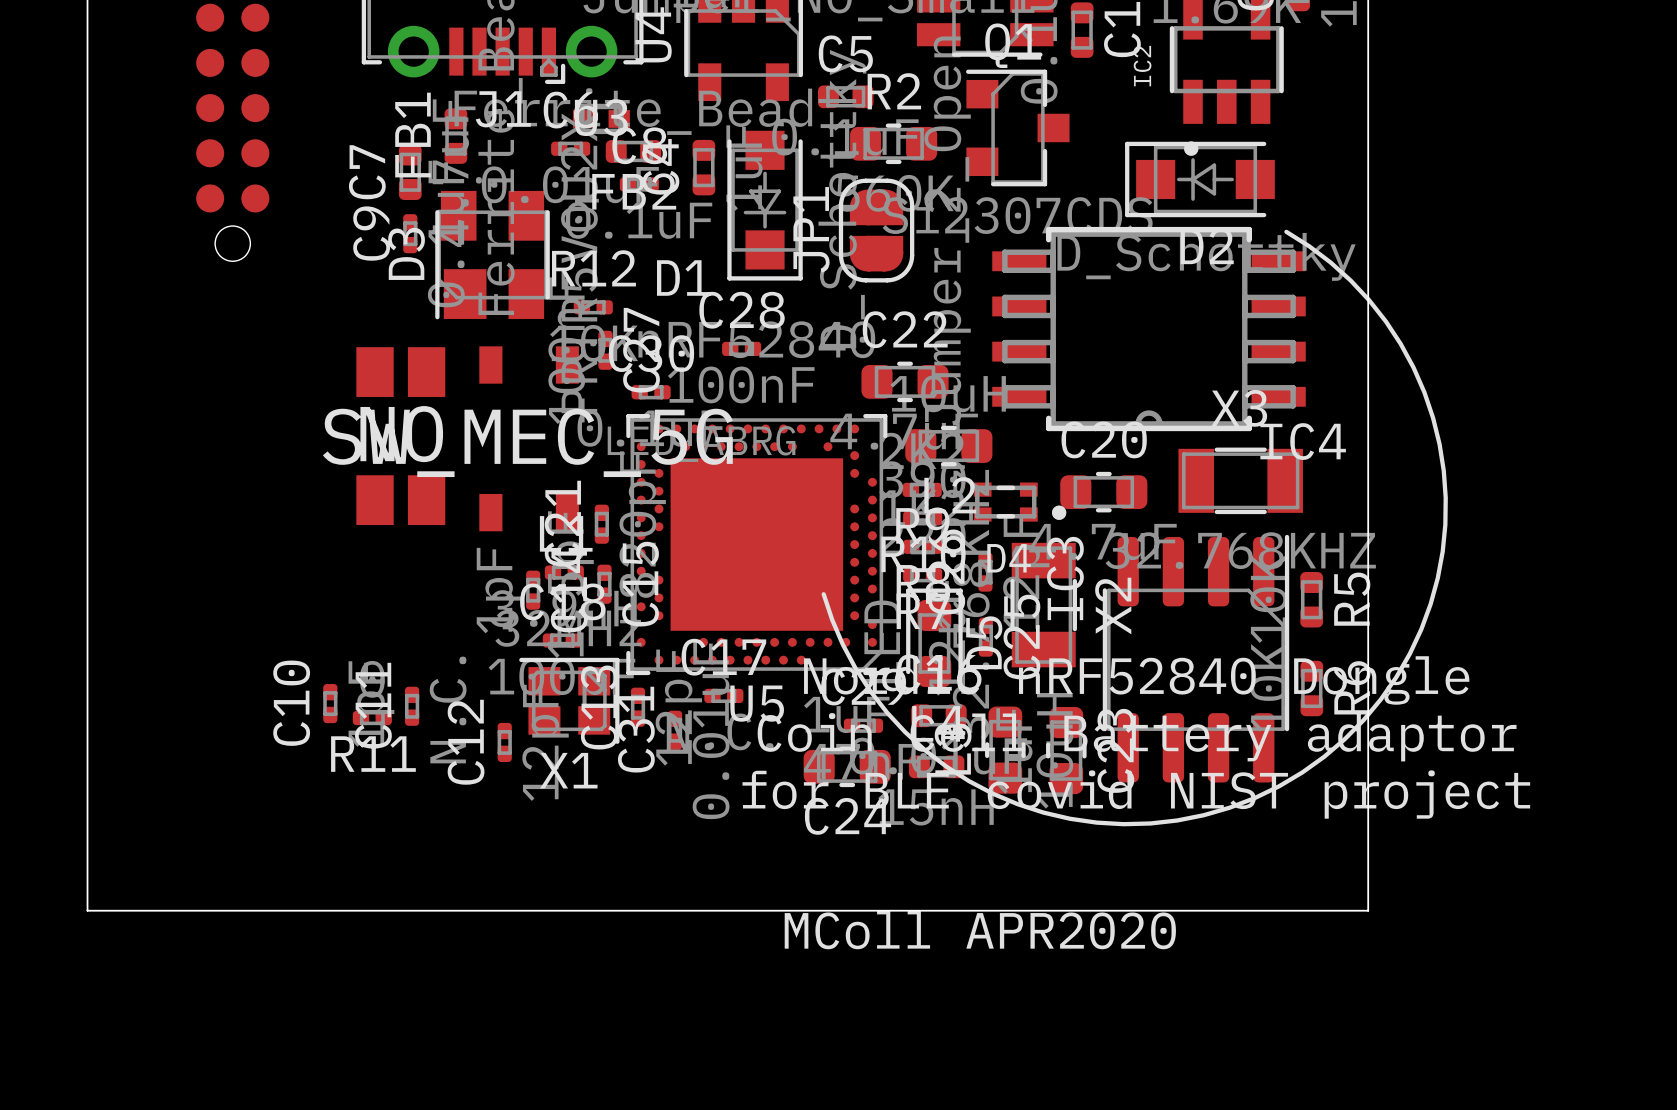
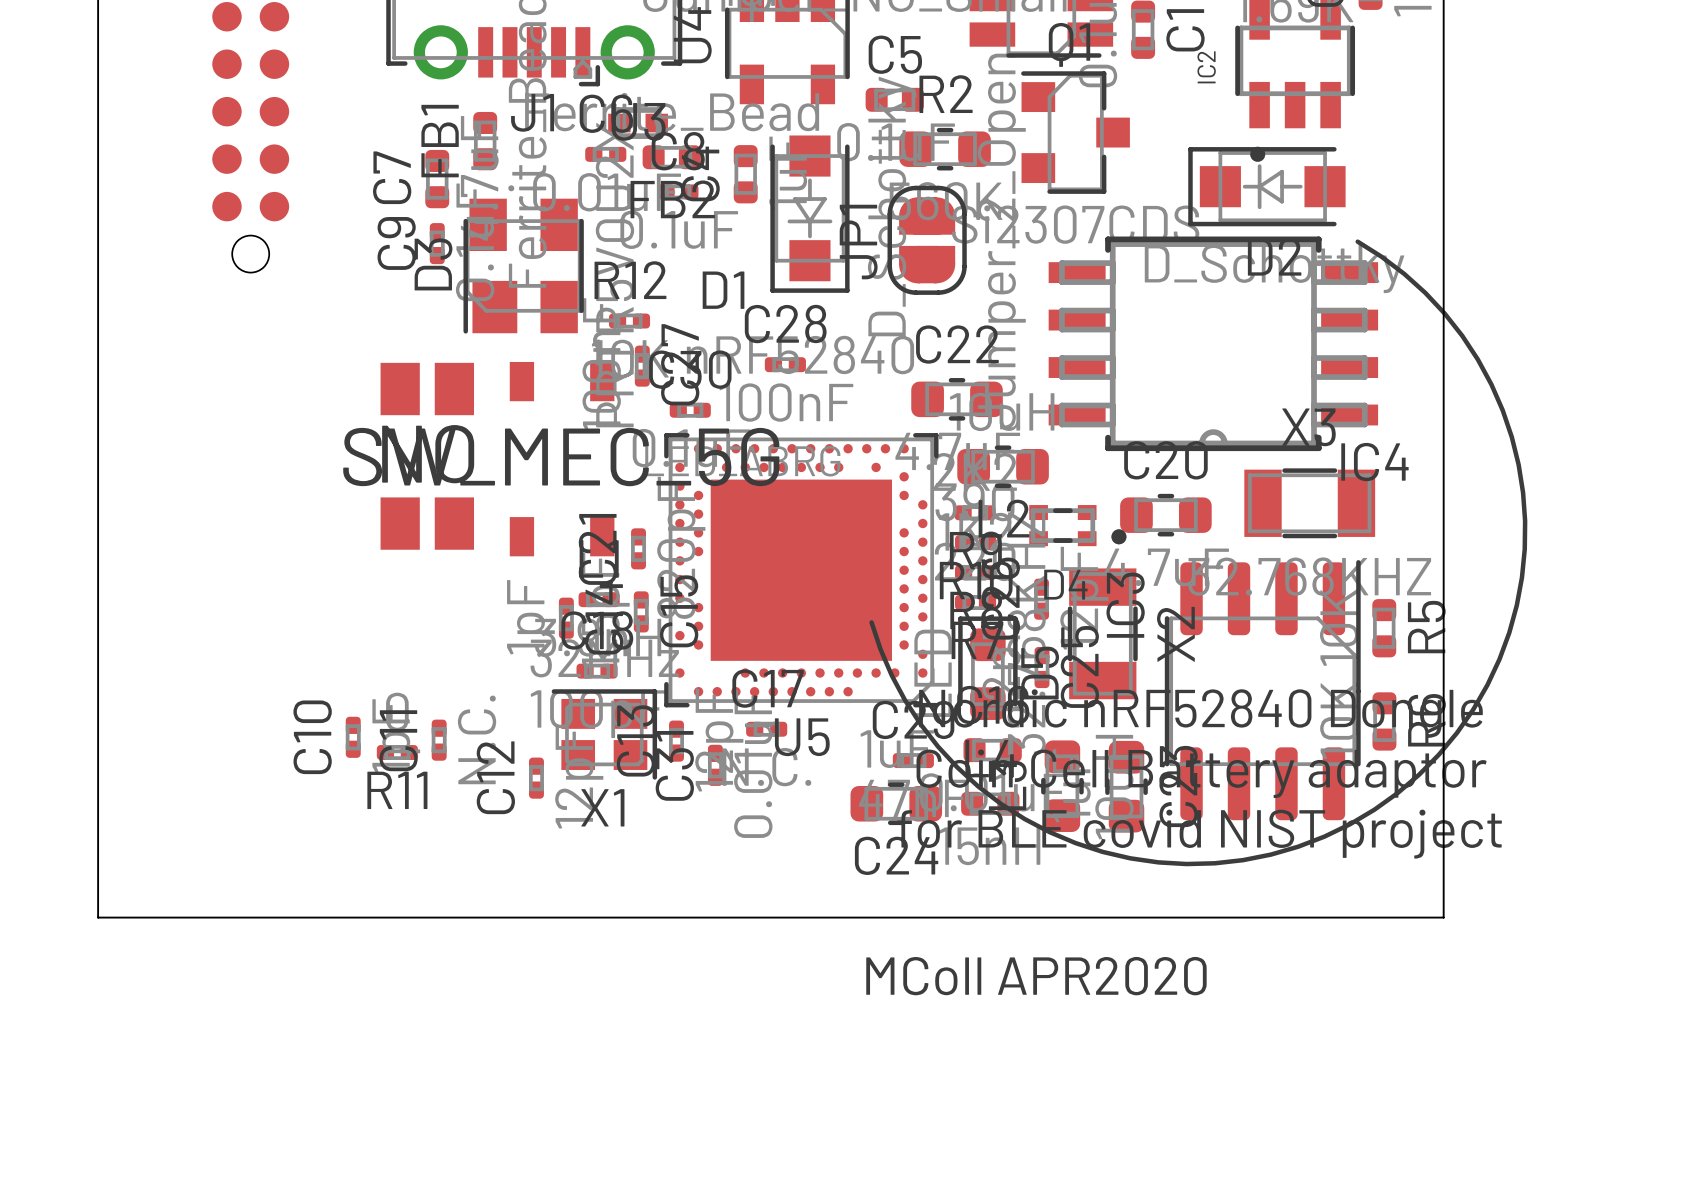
board edge: (87, 875) (87, 910) (1368, 910) (1368, 875) -> (98, 917) (1443, 917)

